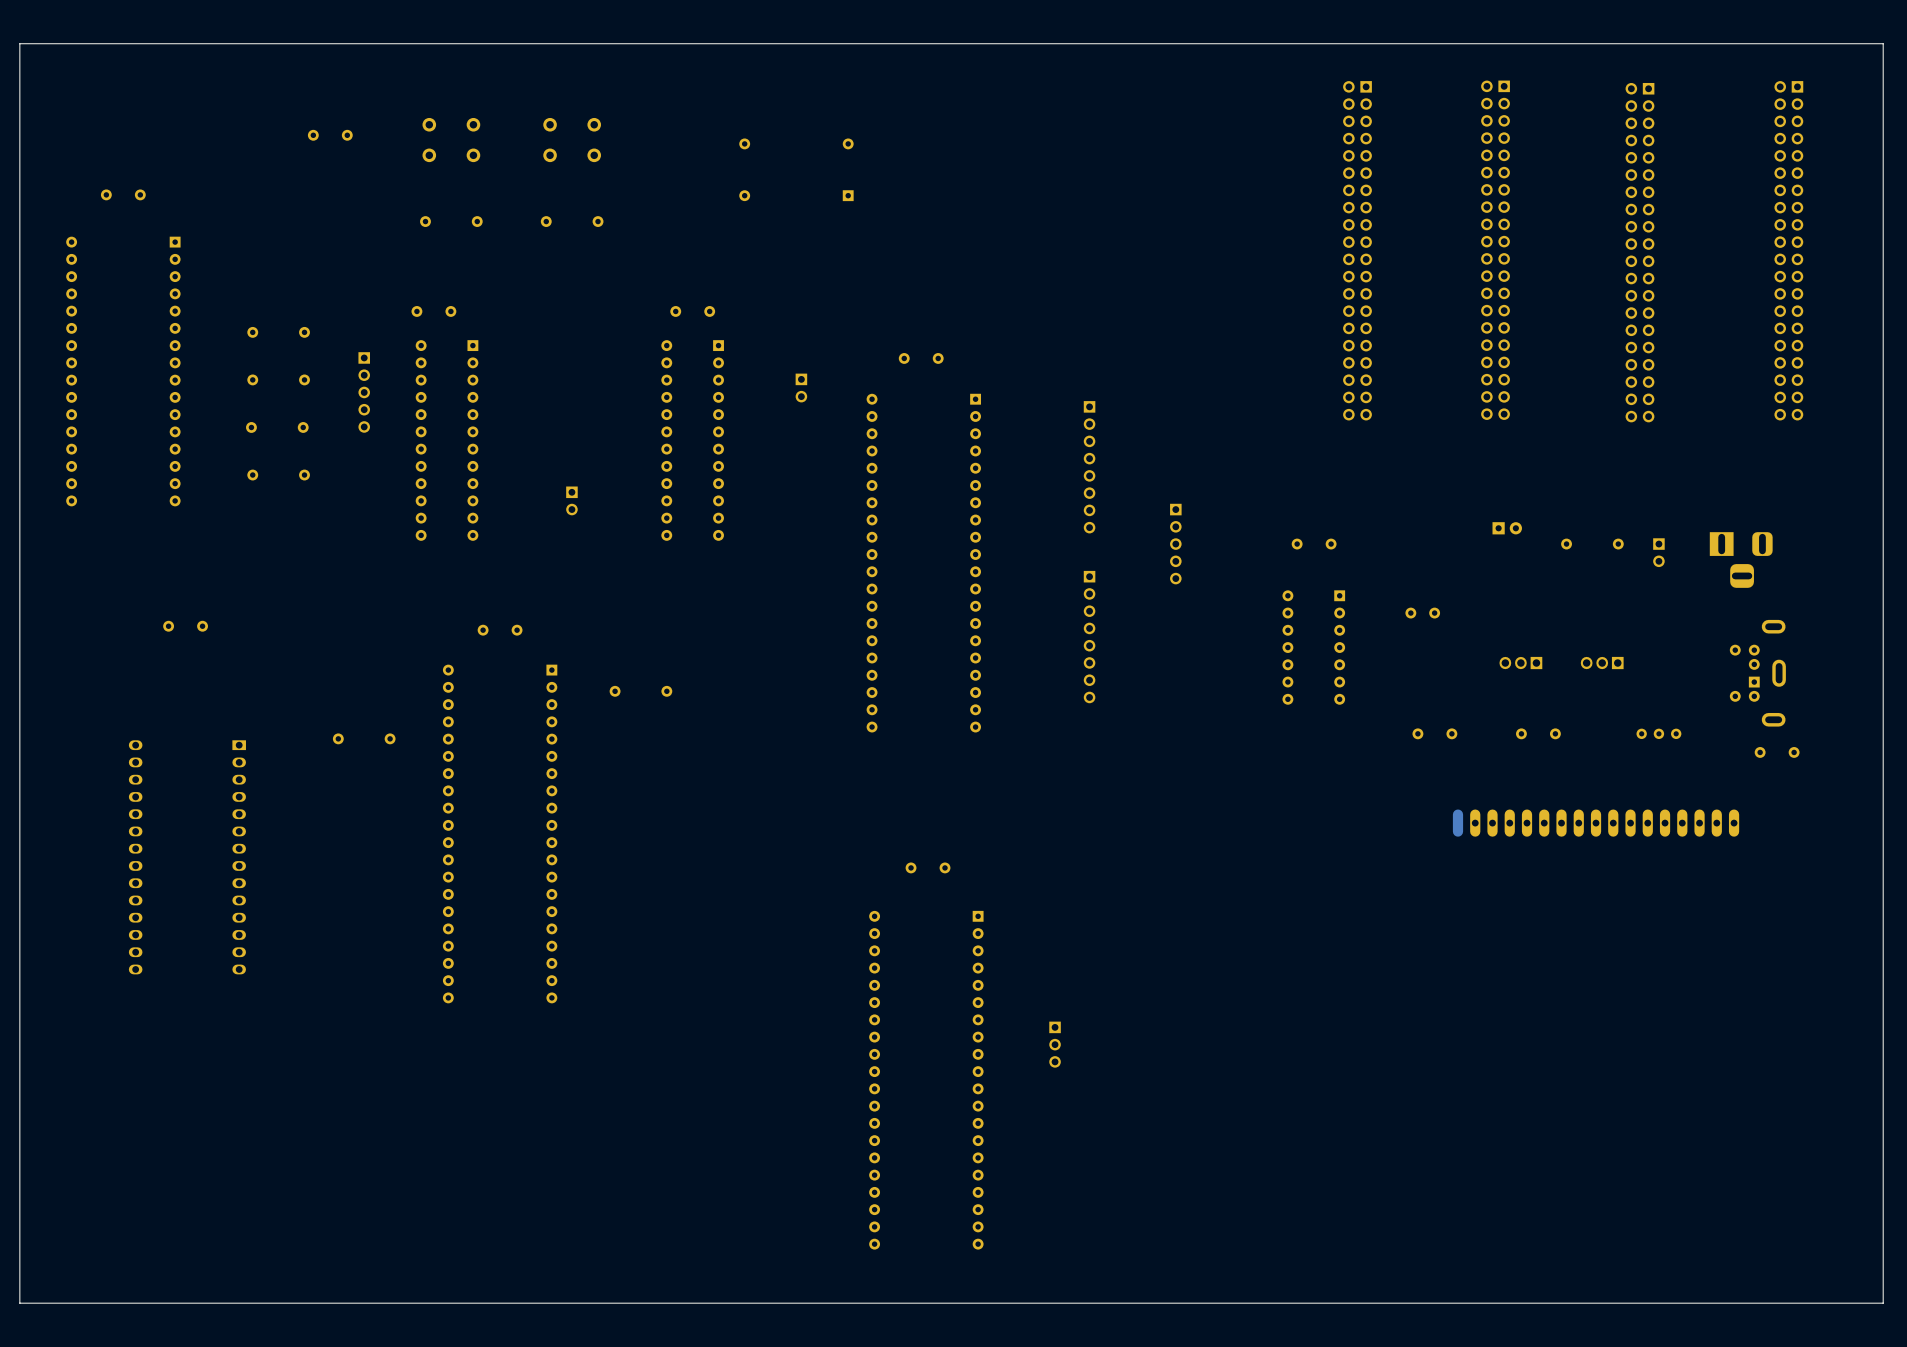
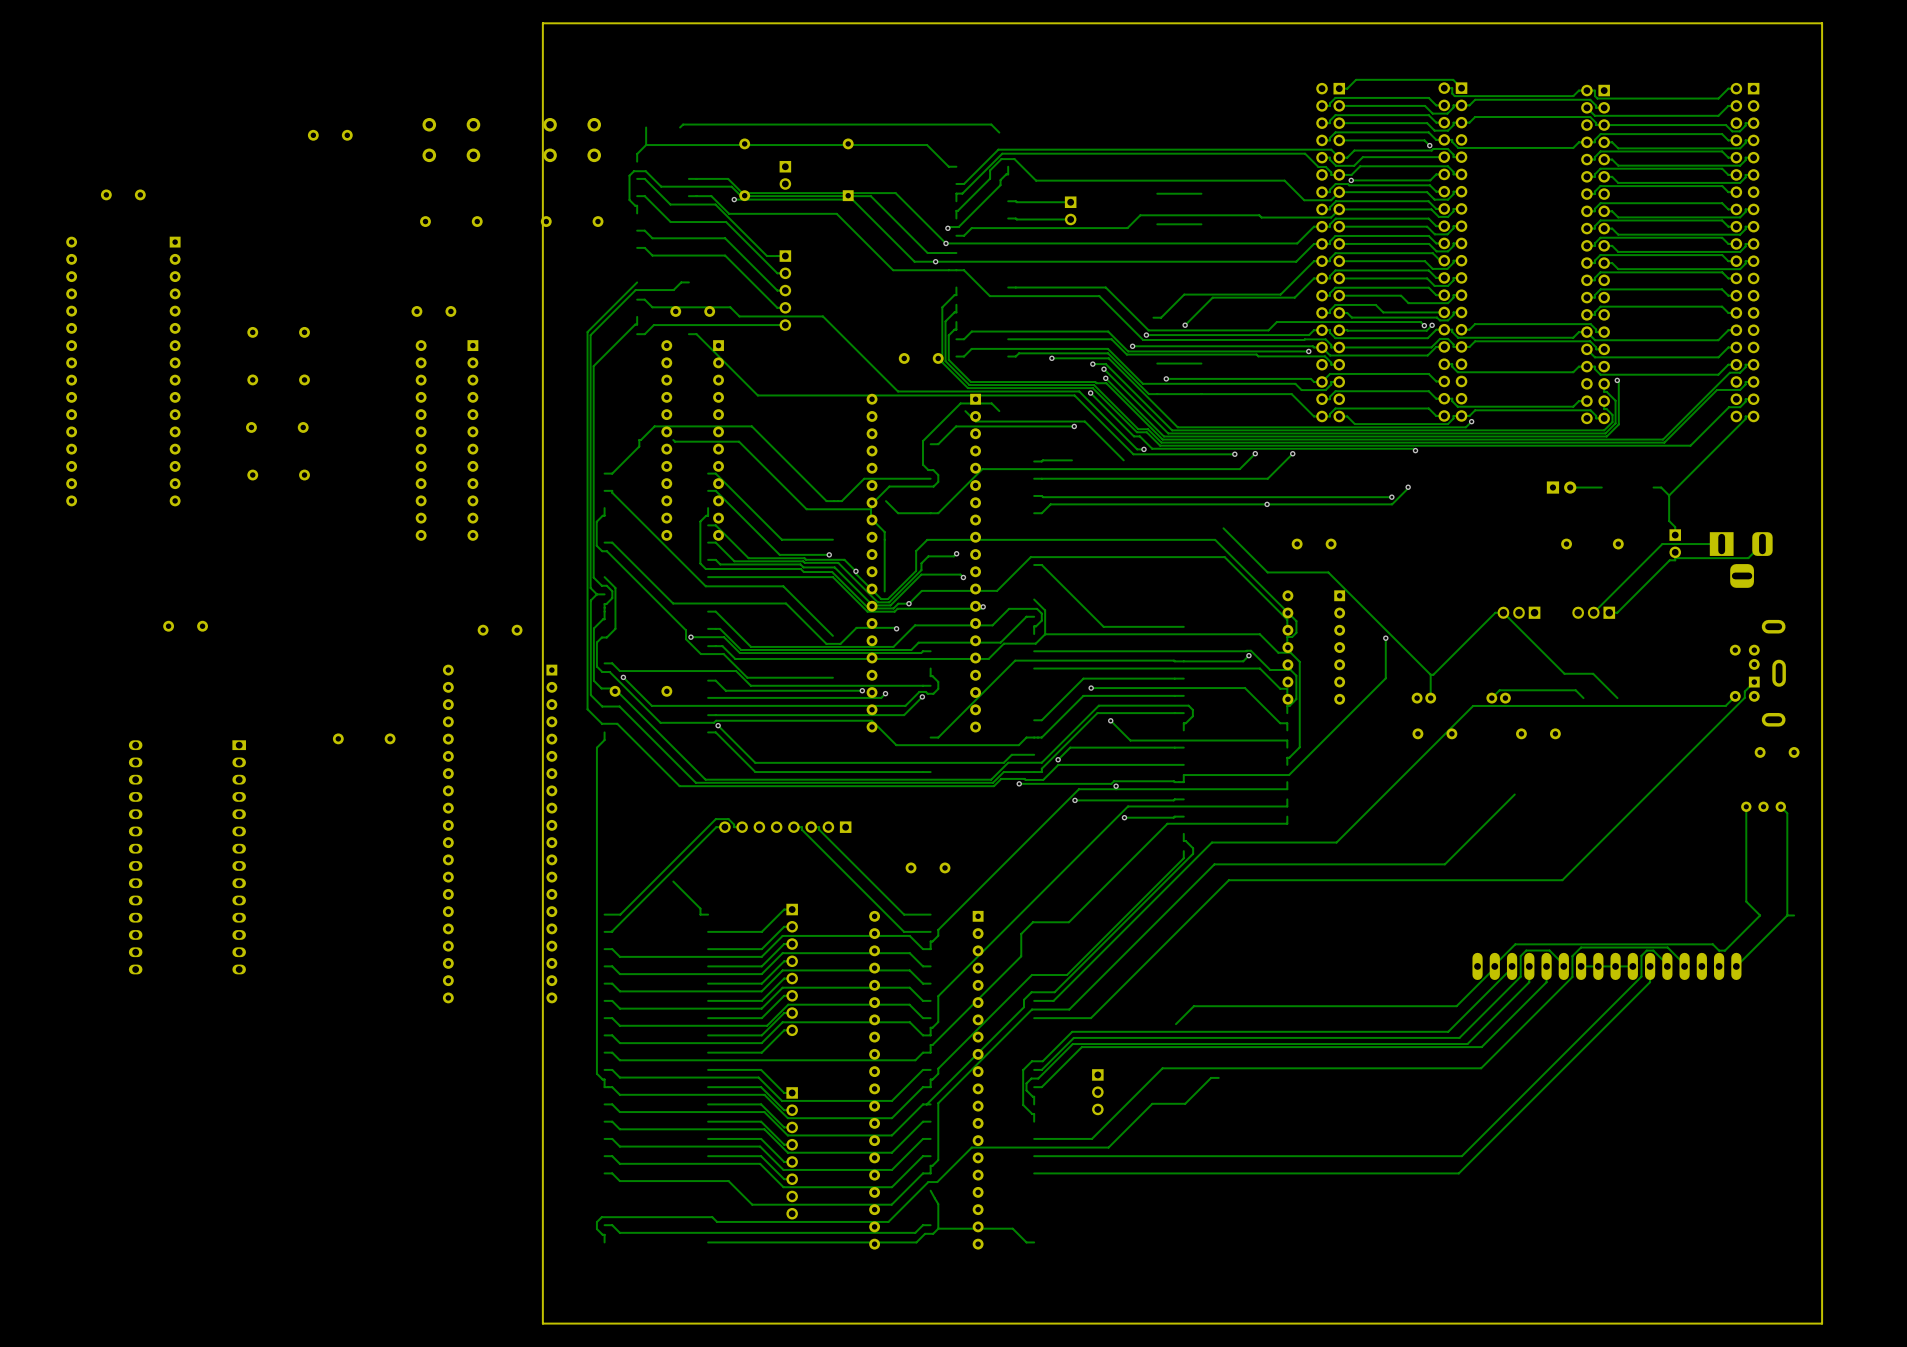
board edge: (1883, 43) (19, 43) (19, 1303) (1883, 1303) (1883, 43) -> (1822, 23) (1822, 1323) (542, 1323) (542, 23) (1822, 23)
track: none -> (1444, 88) (1452, 88) (1452, 93) (1454, 96) (1573, 96) (1578, 90) (1594, 90) (1594, 96) (1597, 98) (1718, 98) (1728, 88) (1736, 88)
track: none -> (1461, 88) (1453, 79) (1356, 79) (1347, 88) (1339, 88)
track: none -> (1339, 105) (1424, 105) (1432, 113) (1447, 113) (1453, 105) (1469, 105) (1475, 99) (1590, 99) (1596, 107) (1604, 107)
track: none -> (1444, 105) (1436, 105) (1428, 97) (1335, 97) (1329, 105) (1322, 105)
track: none -> (1736, 105) (1728, 105) (1718, 115) (1594, 115) (1586, 107)
track: none -> (1444, 122) (1436, 122) (1428, 115) (1335, 115) (1329, 123) (1322, 123)
track: none -> (1753, 123) (1745, 123) (1739, 131) (1732, 131) (1725, 125) (1596, 125) (1590, 117) (1475, 117) (1469, 122) (1453, 122) (1448, 130) (1434, 130) (1427, 123) (1339, 123)
track: none -> (646, 127) (646, 145)
track: none -> (680, 127) (683, 124) (991, 124) (999, 132)
track: none -> (1339, 140) (1424, 140) (1429, 145)
track: none -> (1736, 140) (1728, 140) (1722, 134) (1600, 134) (1594, 142) (1578, 142) (1573, 147) (1458, 147) (1452, 139) (1436, 139) (1428, 132) (1335, 132) (1329, 140) (1322, 140)
track: none -> (1753, 140) (1745, 140) (1740, 148) (1618, 148) (1612, 142) (1604, 142)
track: none -> (646, 145) (637, 154) (637, 161)
track: none -> (646, 145) (927, 145) (948, 166) (956, 166)
via: none -> (1429, 145)
track: none -> (1444, 157) (1362, 157) (1354, 165) (1336, 165) (1329, 157) (1322, 157)
track: none -> (1461, 157) (1453, 157) (1447, 148) (1354, 150) (1347, 157) (1339, 157) (1331, 149) (998, 149) (964, 183) (956, 183)
track: none -> (1736, 157) (1728, 157) (1722, 151) (1600, 151) (1594, 159) (1586, 159)
track: none -> (1753, 157) (1745, 157) (1740, 165) (1618, 165) (1612, 159) (1604, 159)
track: none -> (1008, 166) (1008, 174) (1000, 180) (1000, 185) (958, 227) (947, 228)
track: none -> (1444, 174) (1436, 174) (1430, 180) (1351, 180)
track: none -> (1461, 174) (1453, 174) (1447, 166) (1360, 166) (1351, 174) (1331, 174) (1325, 166) (1318, 166) (1305, 153) (1002, 153) (962, 193) (956, 193) (956, 201)
track: none -> (1736, 174) (1728, 174) (1722, 168) (1600, 168) (1594, 176) (1586, 176)
track: none -> (1753, 174) (1745, 174) (1740, 182) (1618, 182) (1612, 176) (1604, 176)
part: none -> (785, 175)
track: none -> (637, 178) (644, 178) (670, 204) (715, 204) (767, 256) (785, 256)
track: none -> (688, 178) (728, 178) (742, 193) (895, 193) (945, 243) (1297, 243) (1314, 226) (1329, 226) (1335, 218) (1428, 218) (1436, 226) (1444, 226)
via: none -> (1351, 180)
track: none -> (1444, 191) (1436, 191) (1429, 185) (1335, 184) (1329, 192) (1322, 192)
track: none -> (1461, 191) (1453, 191) (1448, 199) (1434, 199) (1427, 192) (1339, 192) (1331, 200) (1304, 200) (1284, 180) (1036, 180) (1014, 159) (1001, 159) (990, 170) (990, 178) (956, 210) (956, 218)
track: none -> (1736, 192) (1728, 192) (1722, 186) (1600, 186) (1594, 194) (1586, 194)
track: none -> (1201, 193) (1157, 193)
track: none -> (637, 196) (644, 196) (670, 222) (726, 222) (777, 273) (785, 273)
track: none -> (688, 196) (711, 196) (729, 213) (836, 213) (893, 270) (964, 270) (989, 296) (1099, 296) (1143, 340) (1325, 339) (1331, 347) (1431, 347) (1440, 338) (1447, 338) (1453, 346) (1469, 346) (1475, 341) (1590, 341) (1596, 349) (1604, 349)
track: none -> (734, 199) (852, 199) (914, 261) (1296, 261) (1314, 243) (1329, 243) (1335, 235) (1428, 235) (1436, 243) (1444, 243)
via: none -> (734, 199)
track: none -> (1008, 201) (1070, 202)
track: none -> (1444, 208) (1436, 208) (1428, 201) (1336, 201) (1329, 209) (1322, 209)
track: none -> (1461, 208) (1453, 208) (1448, 216) (1438, 216) (1431, 209) (1339, 209) (1331, 217) (1140, 215) (1127, 228) (971, 228) (964, 235) (956, 235)
track: none -> (1736, 209) (1728, 209) (1722, 203) (1600, 203) (1594, 211) (1586, 211)
track: none -> (1753, 209) (1745, 209) (1740, 217) (1618, 217) (1612, 211) (1604, 211)
part: none -> (1070, 210)
track: none -> (637, 213) (637, 205) (629, 200) (629, 175) (633, 171) (645, 171) (661, 186) (731, 186) (741, 196) (870, 196) (927, 253) (956, 253)
track: none -> (1008, 218) (1070, 219)
track: none -> (1201, 224) (1157, 224)
track: none -> (1461, 226) (1453, 226) (1447, 234) (1434, 234) (1427, 226) (1339, 226)
track: none -> (1736, 226) (1728, 226) (1722, 220) (1600, 220) (1594, 228) (1586, 228)
track: none -> (1753, 226) (1745, 226) (1740, 234) (1618, 234) (1612, 228) (1604, 228)
via: none -> (947, 228)
track: none -> (637, 230) (644, 230) (652, 238) (725, 238) (777, 290) (785, 290)
via: none -> (945, 243)
track: none -> (1461, 243) (1453, 243) (1448, 251) (1436, 251) (1429, 243) (1339, 243)
track: none -> (1736, 243) (1728, 243) (1722, 237) (1600, 237) (1594, 245) (1586, 245)
track: none -> (1753, 243) (1745, 243) (1740, 251) (1618, 251) (1612, 245) (1604, 245)
track: none -> (637, 247) (644, 247) (652, 255) (725, 255) (777, 307) (785, 307)
part position: (1357, 250) -> (1330, 252)
part position: (1495, 250) -> (1452, 252)
part position: (1788, 250) -> (1744, 252)
part position: (1639, 252) -> (1595, 254)
track: none -> (1444, 260) (1440, 260) (1432, 253) (1335, 253) (1329, 261) (1314, 261) (1280, 294) (1184, 294) (1161, 317) (1153, 317)
track: none -> (1461, 260) (1453, 260) (1447, 268) (1432, 268) (1424, 261) (1339, 261)
via: none -> (935, 261)
track: none -> (1736, 261) (1728, 261) (1722, 255) (1600, 255) (1594, 263) (1586, 263)
track: none -> (1753, 261) (1745, 261) (1740, 269) (1618, 269) (1612, 263) (1604, 263)
track: none -> (1444, 277) (1436, 277) (1428, 270) (1335, 270) (1329, 278) (1314, 278) (1294, 297) (1212, 297) (1185, 325)
track: none -> (1461, 277) (1453, 277) (1448, 285) (1434, 285) (1427, 278) (1339, 278)
track: none -> (1736, 278) (1728, 278) (1722, 272) (1600, 272) (1594, 280) (1586, 280)
track: none -> (637, 282) (587, 332) (587, 709) (602, 723) (617, 723) (679, 786) (993, 786) (1001, 778) (1043, 779) (1058, 764) (1183, 764)
track: none -> (688, 282) (681, 282) (673, 290) (635, 290) (590, 335) (590, 588) (596, 594)
track: none -> (956, 287) (956, 295) (942, 307) (942, 362) (967, 388) (1092, 388) (1136, 432) (1146, 432) (1160, 445) (1690, 445) (1729, 407) (1740, 407) (1745, 399) (1753, 399)
track: none -> (1008, 287) (1105, 287) (1148, 330) (1268, 330) (1276, 322) (1420, 322) (1424, 325)
part: none -> (785, 290)
track: none -> (1444, 295) (1436, 295) (1428, 287) (1335, 287) (1329, 295) (1322, 295)
track: none -> (1461, 295) (1453, 295) (1448, 303) (1408, 303) (1401, 295) (1339, 295)
track: none -> (1736, 295) (1728, 295) (1722, 289) (1600, 289) (1594, 297) (1586, 297)
track: none -> (637, 299) (644, 299) (652, 307) (730, 307) (739, 316) (822, 316) (898, 391) (1079, 391) (1137, 449) (1143, 449)
track: none -> (956, 304) (956, 312) (945, 321) (945, 361) (969, 385) (1094, 385) (1138, 429) (1148, 429) (1161, 442) (1664, 442) (1717, 389) (1740, 389) (1745, 381) (1753, 381)
track: none -> (1444, 312) (1383, 312) (1375, 304) (1335, 304) (1329, 312) (1322, 312)
track: none -> (1461, 312) (1453, 312) (1448, 320) (1439, 320) (1437, 317) (1351, 317) (1347, 312) (1339, 312)
track: none -> (1736, 312) (1728, 312) (1722, 306) (1600, 306) (1594, 314) (1586, 314)
track: none -> (637, 316) (637, 324) (593, 366) (593, 577) (601, 585) (606, 585) (612, 591) (612, 598) (604, 603) (604, 619) (593, 628) (593, 680) (601, 688) (614, 688) (705, 779) (991, 779) (1008, 762) (1041, 762) (1098, 705) (1188, 705) (1192, 709) (1192, 716) (1183, 723) (1183, 730)
track: none -> (956, 322) (956, 329) (948, 335) (948, 359) (970, 382) (1106, 383) (1162, 439) (1663, 439) (1729, 372) (1740, 372) (1745, 364) (1753, 364)
track: none -> (785, 325) (653, 325) (644, 334) (637, 334)
via: none -> (1185, 325)
via: none -> (1424, 325)
track: none -> (1432, 325) (1426, 330) (1339, 330)
via: none -> (1432, 325)
track: none -> (1461, 329) (1469, 329) (1475, 324) (1590, 324) (1596, 332) (1604, 332)
track: none -> (1736, 330) (1728, 330) (1718, 340) (1595, 340) (1586, 332) (1578, 332) (1573, 337) (1458, 337) (1452, 329) (1436, 329) (1427, 338) (1335, 338) (1329, 330) (1314, 330) (1309, 335) (1146, 335)
track: none -> (688, 334) (696, 334) (757, 395) (1074, 395) (1133, 454) (1234, 454)
via: none -> (1146, 335)
track: none -> (956, 339) (964, 339) (971, 331) (1108, 331) (1128, 351) (1308, 351)
track: none -> (1008, 339) (1111, 339) (1126, 354) (1325, 356) (1331, 364) (1339, 364)
track: none -> (1132, 346) (1312, 346) (1322, 347) (1330, 355) (1427, 355) (1436, 346) (1444, 346)
via: none -> (1132, 346)
track: none -> (1736, 347) (1728, 347) (1718, 357) (1594, 357) (1586, 349)
via: none -> (1308, 351)
track: none -> (956, 356) (964, 356) (971, 348) (1107, 348) (1142, 383) (1295, 383) (1301, 390) (1325, 390) (1331, 381) (1339, 381)
track: none -> (1008, 356) (1015, 356) (1018, 353) (1108, 353) (1148, 394) (1291, 394) (1314, 416) (1329, 416) (1335, 408) (1428, 408) (1436, 415) (1444, 415)
track: none -> (1051, 358) (1108, 358) (1177, 427) (1465, 427) (1471, 421)
via: none -> (1051, 358)
track: none -> (1201, 363) (1157, 363)
track: none -> (1092, 364) (1105, 364) (1172, 430) (1604, 430) (1612, 422) (1612, 414) (1604, 409) (1604, 401)
via: none -> (1092, 364)
track: none -> (1444, 364) (1452, 364) (1457, 372) (1573, 372) (1578, 366) (1594, 366) (1600, 374) (1718, 374) (1728, 364) (1736, 364)
track: none -> (1104, 369) (1168, 433) (1605, 433) (1615, 423) (1615, 400) (1606, 391) (1604, 391) (1604, 383)
via: none -> (1104, 369)
track: none -> (1105, 378) (1163, 436) (1606, 436) (1618, 424) (1617, 380)
via: none -> (1105, 378)
track: none -> (1166, 378) (1310, 378) (1314, 381) (1322, 381) (1330, 373) (1428, 373) (1436, 381) (1444, 381)
via: none -> (1166, 378)
via: none -> (1617, 380)
part: (801, 388) -> none
part: (364, 392) -> none
track: none -> (1090, 393) (1133, 436) (1139, 436) (1152, 448) (1413, 448) (1415, 450)
via: none -> (1090, 393)
track: none -> (1322, 399) (1329, 399) (1335, 391) (1428, 391) (1436, 398) (1452, 398) (1457, 406) (1573, 406) (1578, 401) (1586, 401)
track: none -> (965, 411) (975, 421) (1084, 421) (1123, 460)
track: none -> (999, 411) (991, 403) (960, 403) (922, 441) (922, 464) (938, 475) (938, 481) (933, 486) (889, 486) (871, 504) (871, 518) (884, 532) (884, 591)
track: none -> (1339, 416) (1347, 416) (1354, 424) (1447, 424) (1453, 415) (1469, 415) (1475, 410) (1590, 410) (1596, 418) (1604, 418)
track: none -> (1753, 416) (1745, 416) (1745, 418) (1669, 495)
via: none -> (1471, 421)
track: none -> (1074, 426) (956, 426) (938, 444) (930, 444)
via: none -> (1074, 426)
track: none -> (673, 439) (674, 441) (739, 441) (806, 509) (871, 509)
via: none -> (1143, 449)
via: none -> (1415, 450)
track: none -> (1255, 453) (1239, 469) (982, 469) (938, 513) (898, 513) (885, 501)
via: none -> (1255, 453)
track: none -> (1292, 453) (1267, 478) (1034, 478)
via: none -> (1292, 453)
via: none -> (1234, 454)
track: none -> (1071, 460) (1034, 461)
part: (1089, 467) -> none
track: none -> (604, 473) (612, 473) (639, 446) (639, 439) (654, 426) (751, 426) (826, 501) (841, 501) (864, 478) (930, 478)
track: none -> (708, 473) (715, 473) (781, 539) (832, 539)
track: none -> (1408, 487) (1392, 504) (1050, 504) (1041, 513) (1034, 513)
via: none -> (1408, 487)
track: none -> (1601, 487) (1570, 487)
track: none -> (1653, 487) (1661, 487) (1669, 495)
track: none -> (604, 490) (612, 490) (705, 586) (783, 586) (832, 635)
track: none -> (708, 490) (715, 490) (779, 554) (829, 554)
track: none -> (1034, 495) (1391, 497)
track: none -> (1669, 495) (1669, 521) (1675, 527) (1675, 535)
via: none -> (1391, 497)
part: (571, 500) -> none
via: none -> (1267, 504)
track: none -> (604, 508) (604, 515) (596, 521) (596, 545) (602, 551) (606, 551) (686, 630) (686, 639) (700, 654) (723, 654) (747, 677) (832, 677)
track: none -> (708, 508) (708, 515) (700, 521) (700, 563) (705, 568) (800, 568) (803, 572) (832, 572) (868, 608) (893, 608) (898, 603) (908, 603) (921, 590) (997, 590) (1030, 557) (1224, 557) (1287, 619) (1287, 626)
track: none -> (708, 525) (715, 525) (748, 558) (844, 559) (881, 599) (887, 599) (916, 570) (916, 551) (927, 539) (1215, 539) (1296, 621) (1296, 632) (1292, 637) (1287, 637) (1287, 644)
track: none -> (1223, 528) (1267, 572) (1328, 572) (1430, 674)
part position: (1507, 528) -> (1561, 487)
track: none -> (604, 542) (612, 542) (673, 603) (786, 603) (826, 643) (840, 643) (856, 627) (896, 628)
track: none -> (708, 542) (715, 542) (734, 561) (838, 562) (877, 602) (889, 602) (921, 570) (921, 563) (928, 556) (954, 556) (956, 553)
part: (1175, 544) -> none
track: none -> (1721, 544) (1662, 544) (1593, 612)
track: none -> (1762, 544) (1748, 558) (1675, 558)
part position: (1658, 552) -> (1675, 543)
track: none -> (1675, 552) (1675, 560) (1669, 560) (1617, 612) (1609, 612)
via: none -> (956, 553)
via: none -> (829, 554)
track: none -> (708, 559) (715, 559) (720, 564) (800, 564) (803, 567) (834, 567) (872, 605) (890, 605) (921, 574) (960, 574) (963, 577)
track: none -> (1034, 565) (1041, 565) (1103, 626) (1183, 626)
via: none -> (855, 571)
track: none -> (604, 577) (615, 588) (615, 628) (606, 637) (601, 637) (596, 642) (596, 666) (602, 672) (609, 672) (660, 722) (714, 722) (716, 720) (871, 720) (896, 745) (1018, 745) (1026, 737) (1041, 737) (1083, 695) (1183, 695)
track: none -> (708, 577) (832, 577) (867, 611) (894, 611) (897, 608) (981, 608) (983, 606)
via: none -> (963, 577)
track: none -> (596, 594) (590, 600) (590, 695) (602, 706) (619, 706) (695, 782) (993, 782) (1003, 772) (1041, 772) (1041, 768) (1097, 713) (1183, 713)
track: none -> (604, 594) (596, 594)
track: none -> (1034, 599) (1045, 610) (1045, 634)
via: none -> (908, 603)
via: none -> (983, 606)
track: none -> (708, 611) (715, 611) (751, 646) (893, 646) (915, 625) (992, 625) (1009, 608) (1037, 608) (1041, 613) (1041, 620) (1034, 626) (1034, 634)
part: none -> (1519, 612)
part: none -> (1593, 612)
part: (1422, 613) -> none
track: none -> (1034, 616) (1026, 616) (1000, 642) (918, 642) (911, 649) (741, 649) (720, 628) (708, 628)
via: none -> (896, 628)
track: none -> (1045, 634) (1035, 643) (1003, 643) (988, 658) (735, 658) (722, 646) (708, 646)
track: none -> (1045, 634) (1259, 634) (1278, 652) (1290, 652) (1299, 661) (1299, 747) (1287, 757) (1287, 764)
track: none -> (690, 637) (724, 637) (739, 653) (921, 653) (930, 651)
via: none -> (690, 637)
part: (1089, 637) -> none
track: none -> (1385, 638) (1385, 678) (1289, 775) (1183, 775) (1183, 782) (1114, 781) (1111, 783) (1019, 783)
via: none -> (1385, 638)
track: none -> (1034, 651) (1250, 650) (1270, 669) (1290, 669) (1296, 675) (1296, 699) (1287, 706) (1287, 713)
track: none -> (1248, 655) (1243, 661) (1015, 660) (938, 737) (930, 737)
via: none -> (1248, 655)
track: none -> (604, 663) (612, 663) (619, 671) (736, 671) (750, 685) (922, 685)
part: (1520, 663) -> none
part: (1602, 663) -> none
track: none -> (930, 668) (930, 676) (938, 681) (938, 688) (933, 693) (919, 691) (905, 705) (651, 705) (623, 677)
track: none -> (1034, 668) (1259, 668) (1280, 688) (1287, 688) (1287, 695)
track: none -> (1430, 674) (1433, 674) (1495, 612) (1503, 612) (1564, 673) (1593, 673) (1617, 698)
track: none -> (1430, 674) (1430, 698)
via: none -> (623, 677)
track: none -> (1183, 678) (1083, 678) (1041, 720) (1034, 720)
track: none -> (708, 680) (715, 680) (725, 690) (862, 690)
track: none -> (1754, 682) (1744, 691) (1744, 697) (1562, 880) (1228, 880) (1090, 1018) (1034, 1018)
track: none -> (930, 685) (922, 685)
track: none -> (1091, 688) (1245, 688) (1280, 723) (1287, 723) (1287, 730)
via: none -> (1091, 688)
via: none -> (862, 690)
track: none -> (885, 693) (881, 697) (708, 697)
via: none -> (885, 693)
track: none -> (922, 696) (904, 715) (708, 715)
via: none -> (922, 696)
track: none -> (1735, 696) (1725, 705) (1473, 705) (1336, 842) (1211, 842) (1053, 1000) (1034, 1000)
part: none -> (1423, 698)
part: none -> (1498, 698)
track: none -> (1583, 698) (1575, 690) (1499, 690) (1491, 698)
track: none -> (1110, 720) (1130, 740) (1287, 740) (1287, 747)
via: none -> (1110, 720)
track: none -> (718, 725) (755, 762) (1003, 762) (1011, 754) (1034, 754)
via: none -> (718, 725)
track: none -> (604, 732) (604, 740) (596, 747) (596, 1073) (604, 1079) (604, 1087) (612, 1087) (619, 1094) (764, 1094) (787, 1118) (891, 1118) (922, 1087) (930, 1087) (930, 1079) (938, 1073) (938, 1068) (1031, 975) (1067, 975) (1183, 858) (1183, 851)
track: none -> (708, 732) (715, 732) (755, 772) (930, 772)
part position: (1658, 733) -> (1763, 806)
track: none -> (1183, 747) (1070, 747) (1058, 759)
via: none -> (1058, 759)
track: none -> (1287, 782) (1287, 789) (1078, 789) (938, 929) (938, 935) (930, 941) (930, 949) (922, 949) (909, 935) (782, 935) (761, 956) (619, 956) (612, 949) (604, 949)
via: none -> (1019, 783)
via: none -> (1116, 786)
track: none -> (1514, 794) (1444, 864) (1214, 864) (1069, 1009) (1031, 1009) (938, 1103) (938, 1160) (930, 1165) (930, 1173) (922, 1173) (891, 1204) (752, 1204) (728, 1181) (619, 1181) (612, 1173) (604, 1173)
track: none -> (1183, 799) (1074, 800)
track: none -> (1287, 799) (1287, 806) (1127, 806) (938, 996) (938, 1022) (930, 1027) (930, 1035) (922, 1035) (909, 1022) (782, 1022) (761, 1043) (619, 1043) (612, 1035) (604, 1035)
via: none -> (1074, 800)
track: none -> (1746, 806) (1746, 901) (1760, 915) (1725, 950) (1719, 950) (1712, 944) (1515, 944) (1456, 1006) (1193, 1006) (1175, 1024)
track: none -> (1780, 806) (1787, 813) (1787, 915)
track: none -> (1183, 816) (1124, 817)
track: none -> (1287, 816) (1287, 823) (1167, 823) (1068, 922) (1032, 922) (1021, 933) (1021, 956) (930, 1045) (930, 1052) (922, 1052) (915, 1060) (619, 1060) (612, 1052) (604, 1052)
via: none -> (1124, 817)
part: (1596, 823) -> none
track: none -> (724, 827) (716, 827) (612, 931) (604, 931)
track: none -> (742, 827) (734, 827) (728, 819) (715, 819) (620, 914) (604, 914)
part: none -> (785, 827)
track: none -> (793, 827) (801, 827) (801, 829) (904, 931) (930, 931)
track: none -> (811, 827) (819, 827) (819, 829) (904, 914) (930, 914)
track: none -> (1183, 833) (1183, 840) (1193, 848) (1193, 853) (1054, 992) (1031, 992) (1023, 999) (1023, 1007) (926, 1104)
track: none -> (673, 881) (700, 908) (700, 914) (708, 914)
track: none -> (792, 909) (784, 909) (761, 931) (708, 931)
track: none -> (1787, 915) (1736, 966)
track: none -> (1794, 915) (1787, 915)
track: none -> (792, 926) (784, 926) (761, 949) (708, 949)
track: none -> (792, 944) (784, 944) (761, 966) (708, 966)
track: none -> (792, 961) (784, 961) (761, 983) (708, 983)
track: none -> (930, 966) (922, 966) (909, 953) (782, 953) (761, 974) (619, 974) (612, 966) (604, 966)
track: none -> (1512, 966) (1448, 1031) (1072, 1031) (1042, 1061) (1031, 1061) (1023, 1070) (1023, 1104) (1034, 1114) (1034, 1121)
track: none -> (1529, 966) (1529, 982) (1467, 1044) (1072, 1044) (1038, 1078) (1031, 1078) (1026, 1083) (1026, 1090) (1034, 1096) (1034, 1104)
track: none -> (1546, 966) (1546, 982) (1481, 1047) (1081, 1047) (1041, 1087) (1034, 1087)
track: none -> (1563, 966) (1549, 950) (1526, 950) (1520, 956) (1520, 976) (1459, 1037) (1073, 1037) (1041, 1069) (1034, 1069)
part: none -> (1606, 966)
track: none -> (1632, 966) (1581, 966)
track: none -> (1650, 966) (1650, 982) (1458, 1173) (1034, 1173)
track: none -> (1667, 966) (1653, 950) (1646, 950) (1641, 955) (1641, 976) (1461, 1156) (1034, 1156)
track: none -> (1684, 966) (1667, 947) (1581, 947) (1572, 956) (1572, 977) (1481, 1068) (1162, 1068) (1091, 1138) (1034, 1138)
part: none -> (792, 969)
track: none -> (792, 978) (784, 978) (761, 1000) (708, 1000)
track: none -> (930, 983) (922, 983) (909, 970) (782, 970) (761, 991) (619, 991) (612, 983) (604, 983)
track: none -> (792, 995) (784, 995) (761, 1018) (708, 1018)
track: none -> (930, 1000) (922, 1000) (909, 987) (782, 987) (761, 1008) (619, 1008) (612, 1000) (604, 1000)
track: none -> (792, 1013) (784, 1013) (761, 1035) (708, 1035)
track: none -> (930, 1018) (922, 1018) (909, 1004) (788, 1004) (767, 1025) (619, 1025) (612, 1018) (604, 1018)
track: none -> (792, 1030) (784, 1030) (761, 1052) (708, 1052)
part position: (1055, 1044) -> (1097, 1092)
track: none -> (708, 1069) (761, 1069) (784, 1092) (792, 1092)
track: none -> (930, 1069) (922, 1069) (891, 1100) (782, 1100) (758, 1077) (619, 1077) (612, 1069) (604, 1069)
track: none -> (1218, 1077) (1211, 1077) (1185, 1103) (1152, 1103) (1108, 1147) (971, 1147) (937, 1182) (928, 1182) (888, 1221) (717, 1221) (712, 1217) (601, 1217) (596, 1222) (596, 1229) (604, 1234) (604, 1242)
track: none -> (708, 1087) (761, 1087) (784, 1110) (792, 1110)
track: none -> (708, 1104) (761, 1104) (784, 1127) (792, 1127)
track: none -> (930, 1104) (922, 1104) (891, 1135) (787, 1135) (764, 1112) (619, 1112) (612, 1104) (604, 1104)
track: none -> (708, 1121) (761, 1121) (784, 1144) (792, 1144)
track: none -> (930, 1121) (922, 1121) (891, 1152) (787, 1152) (764, 1129) (619, 1129) (612, 1121) (604, 1121)
track: none -> (708, 1138) (761, 1138) (784, 1161) (792, 1161)
track: none -> (930, 1138) (922, 1138) (891, 1169) (783, 1169) (760, 1146) (619, 1146) (612, 1138) (604, 1138)
part: none -> (792, 1153)
track: none -> (708, 1156) (761, 1156) (784, 1179) (792, 1179)
track: none -> (930, 1156) (922, 1156) (891, 1187) (783, 1187) (760, 1163) (619, 1163) (612, 1156) (604, 1156)
track: none -> (930, 1190) (938, 1204) (938, 1228)
track: none -> (930, 1225) (922, 1225) (915, 1232) (619, 1232) (612, 1225) (604, 1225)
track: none -> (938, 1228) (1012, 1228) (1026, 1242) (1034, 1242)
track: none -> (938, 1228) (933, 1233) (925, 1233) (916, 1242) (708, 1242)

